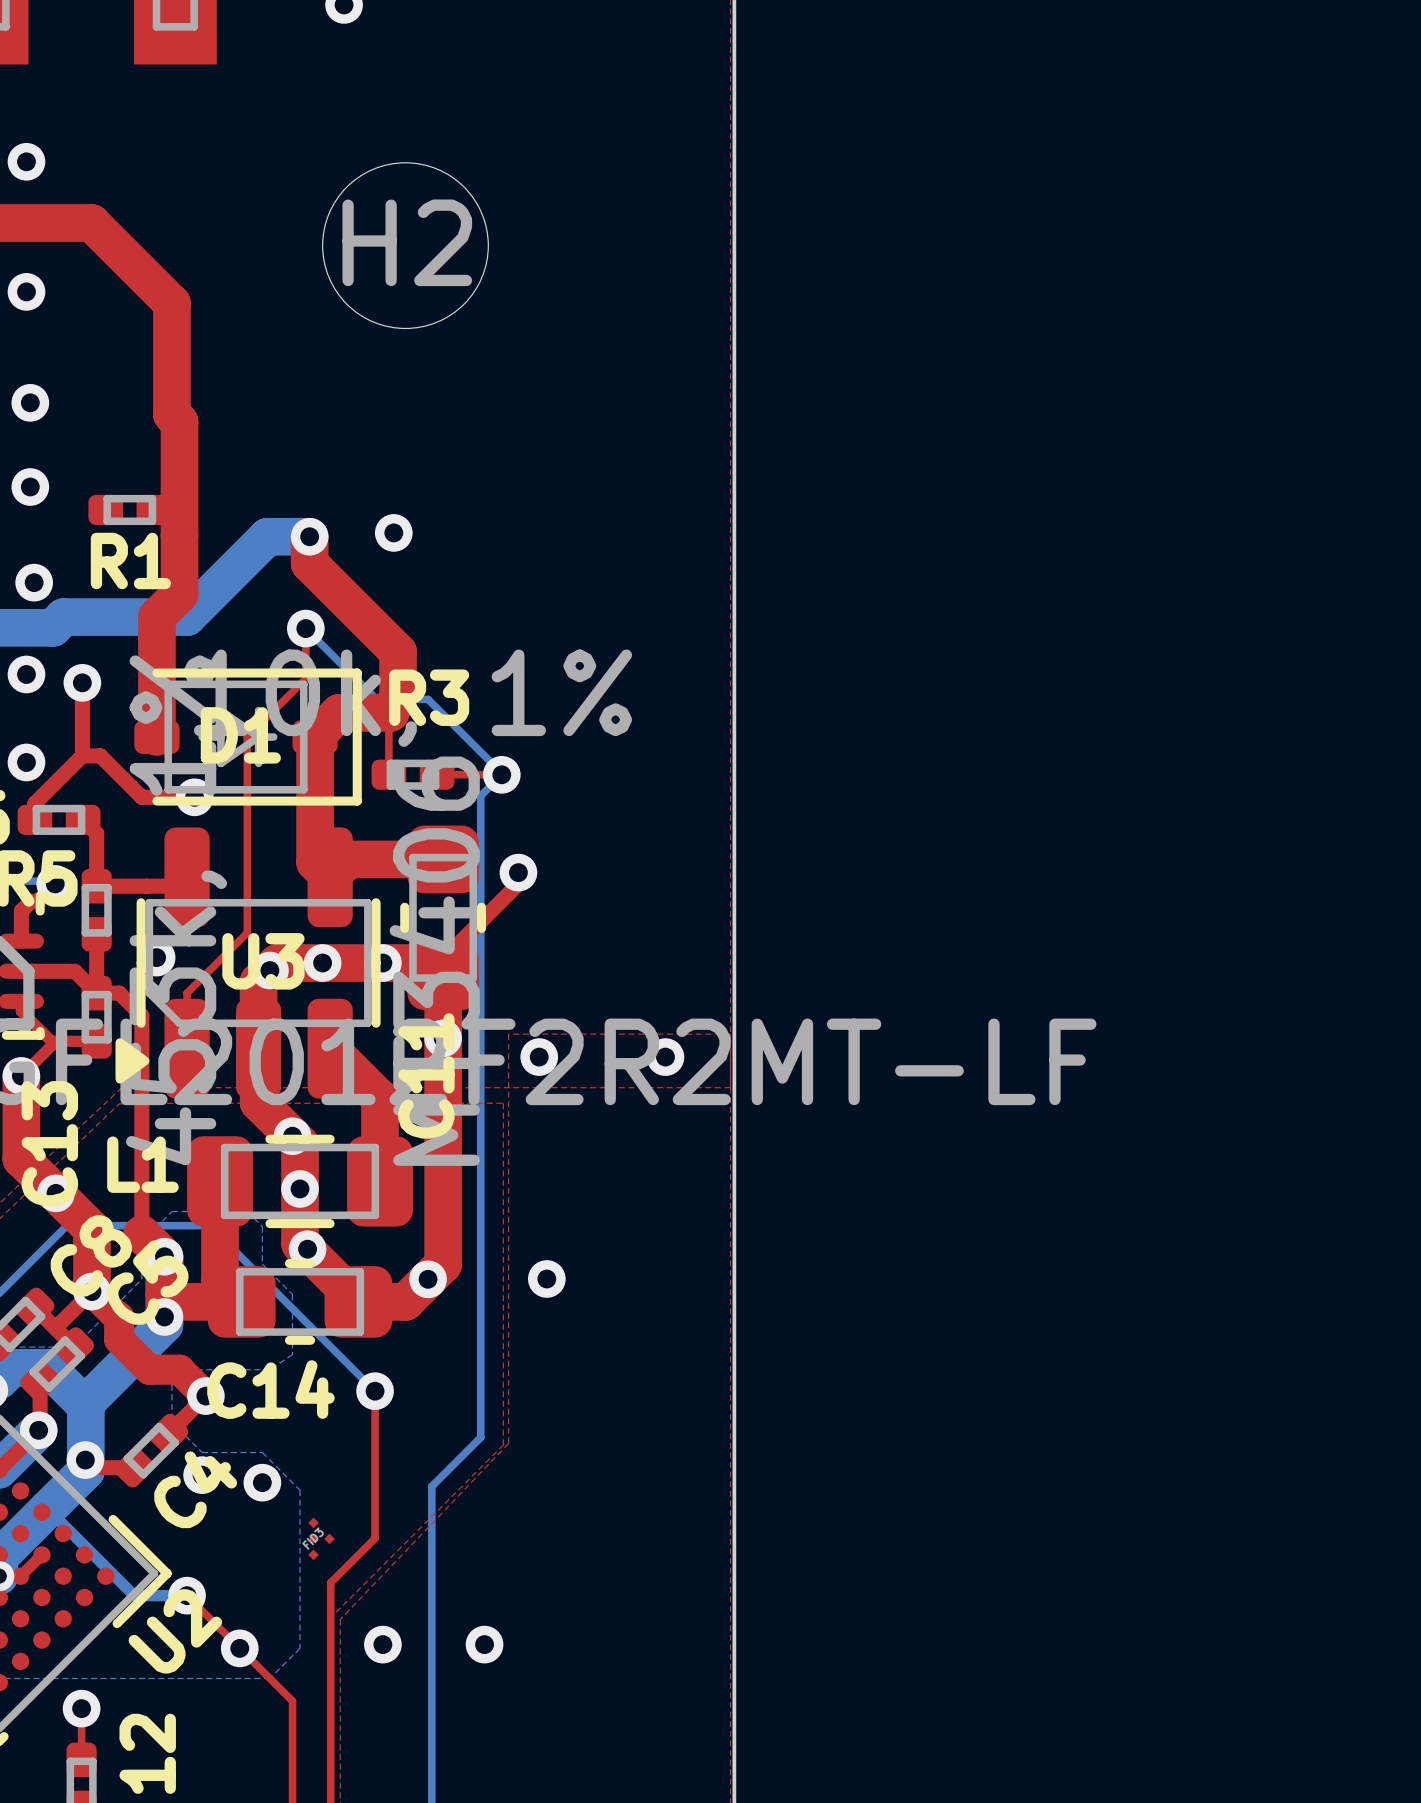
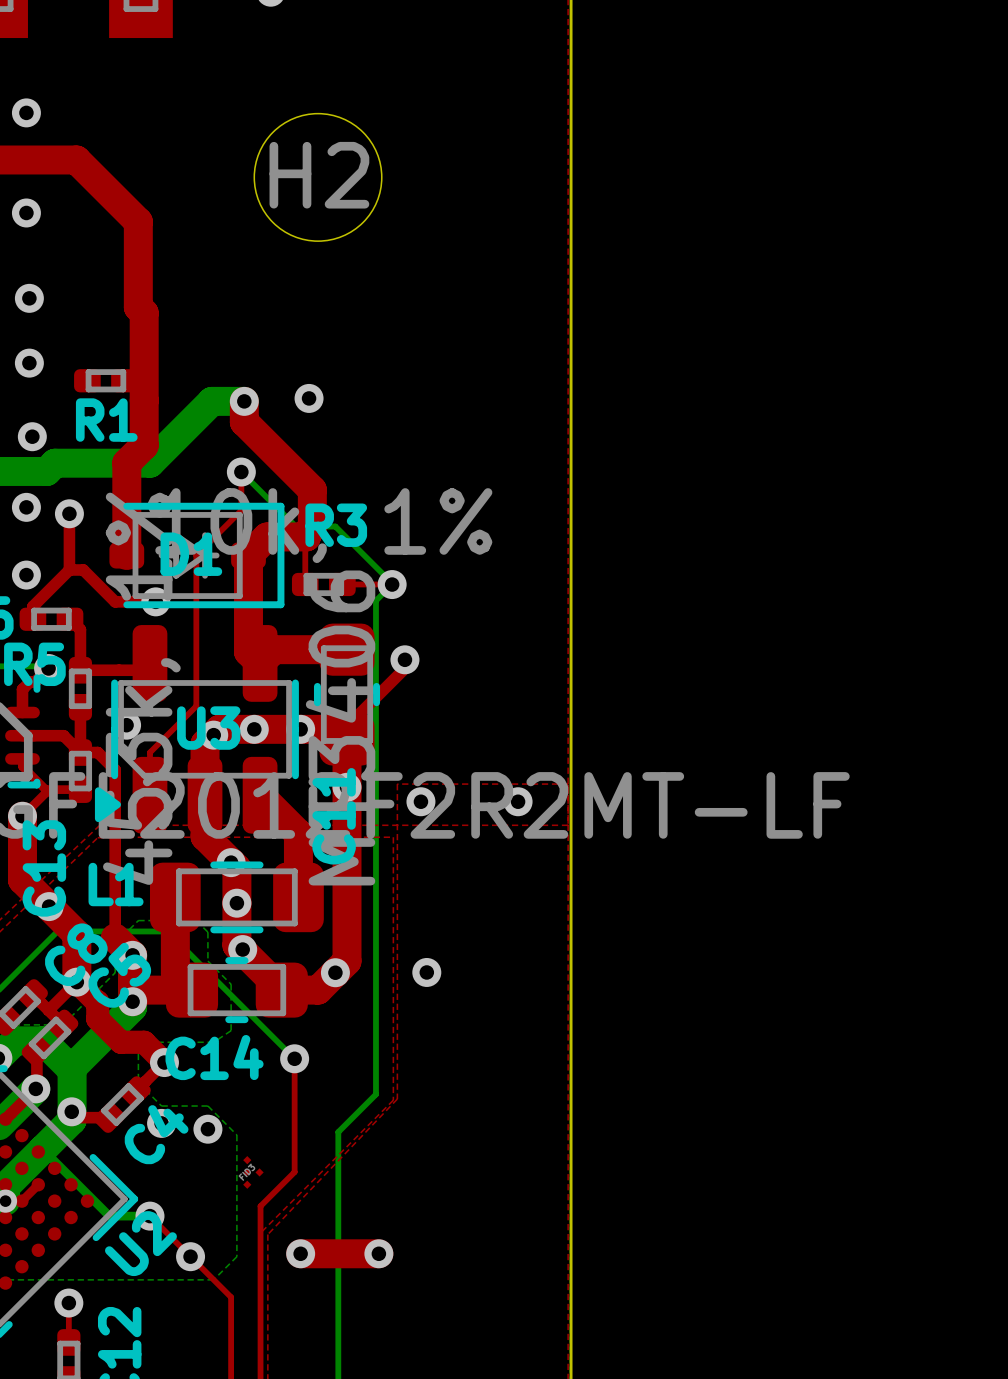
top track: none -> (300, 1253) (378, 1253)

